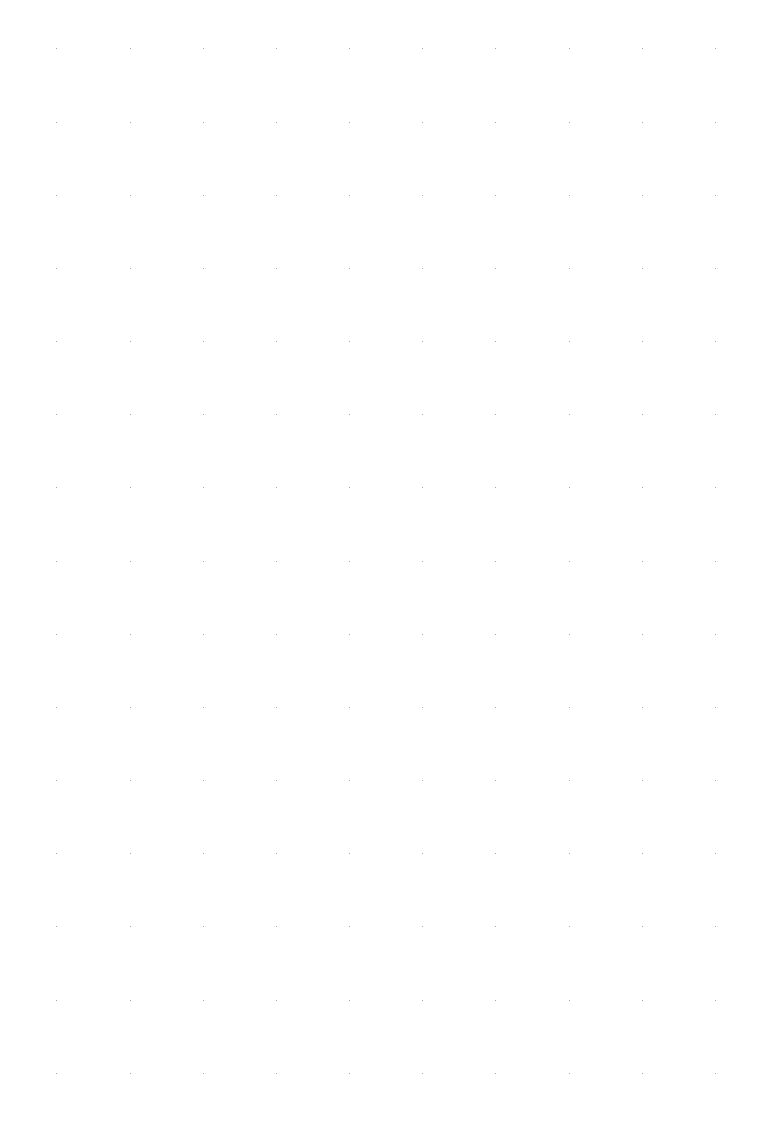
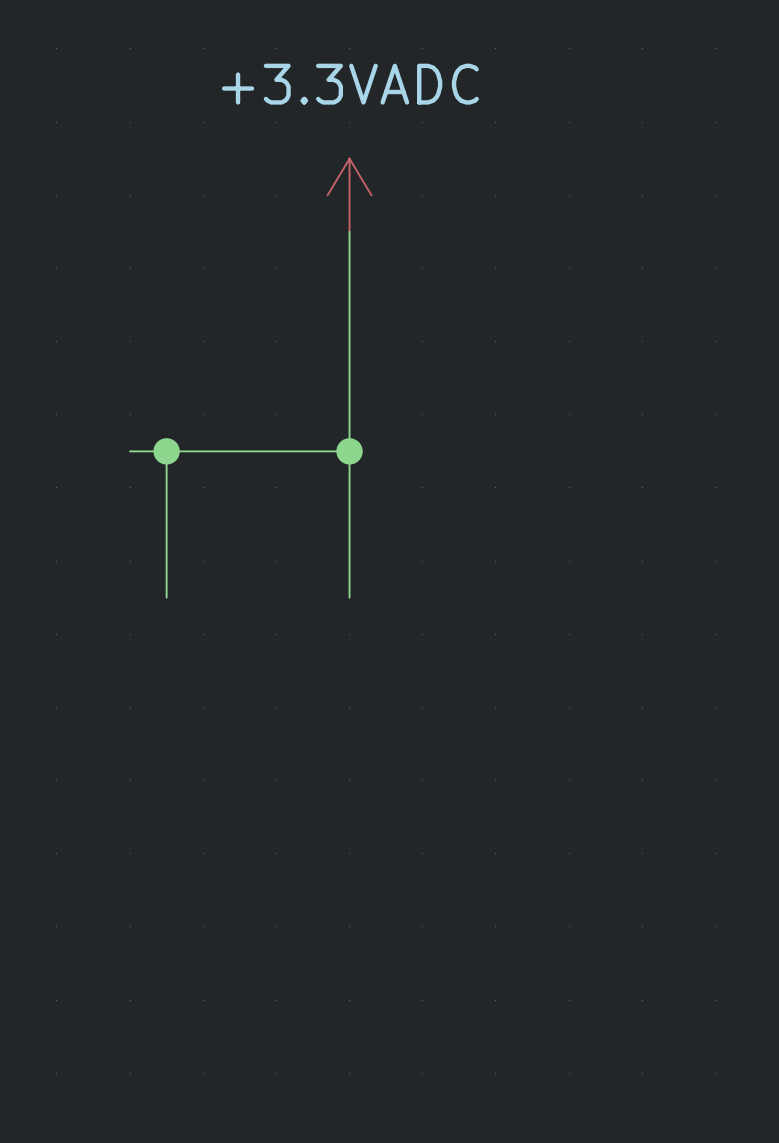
power symbol: none -> +3.3VADC (349, 195)
wire: none -> (349, 231) (349, 597)
wire: none -> (130, 451) (349, 451)
wire: none -> (166, 451) (166, 597)
junction: none -> (166, 451)
junction: none -> (349, 451)

